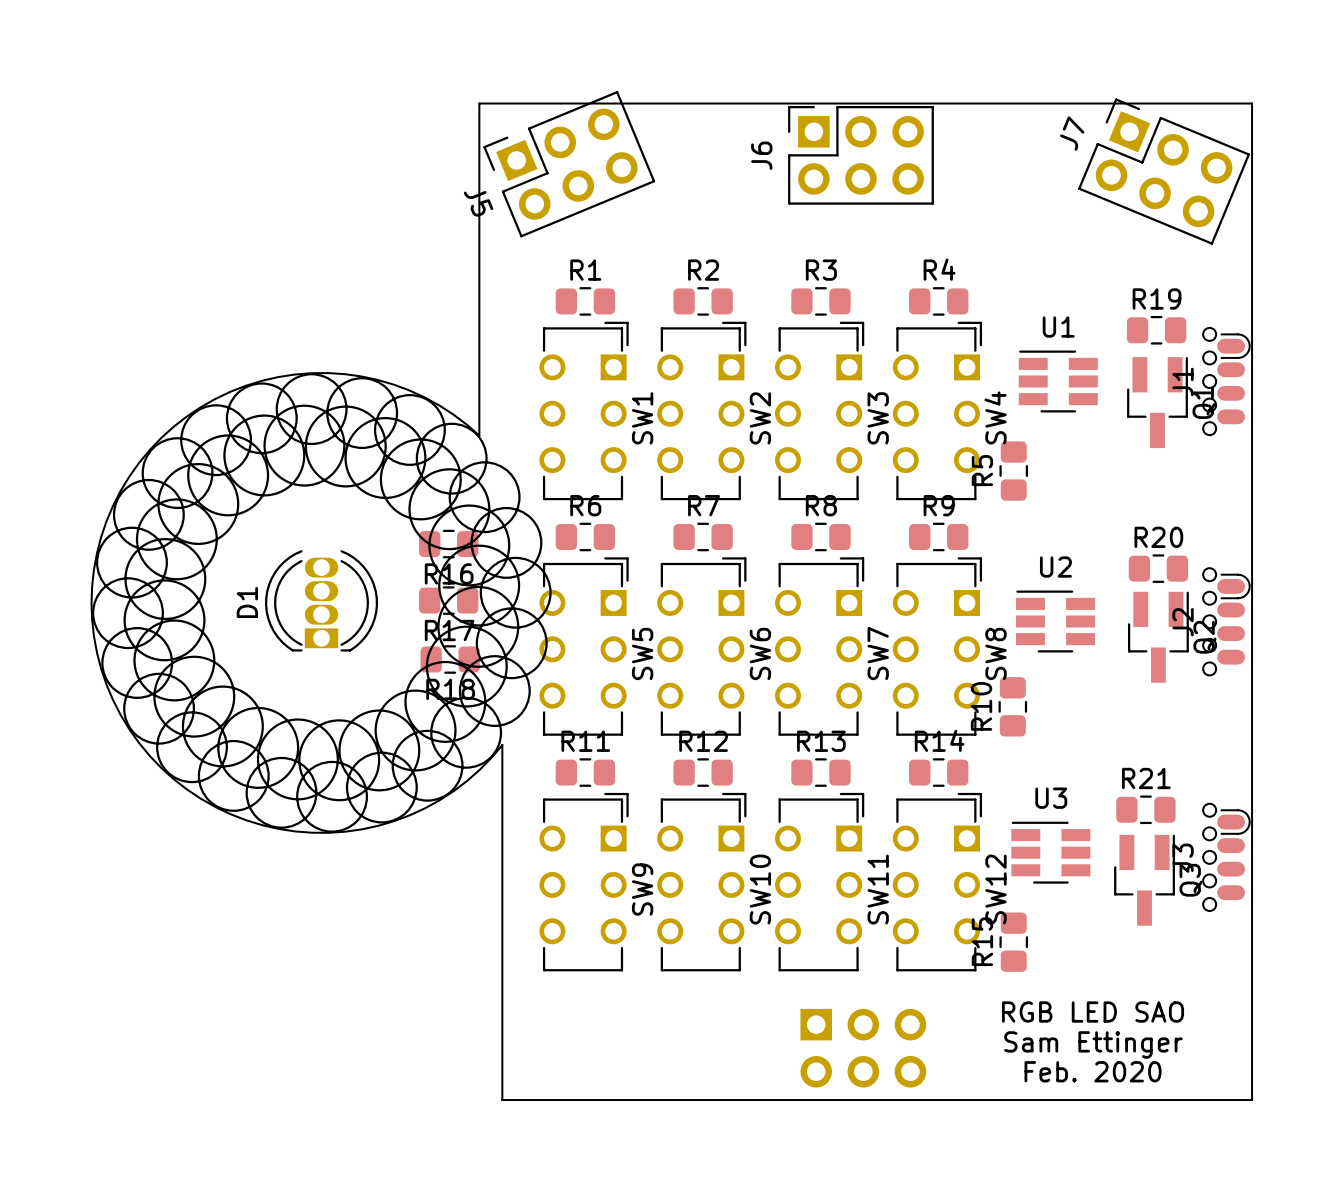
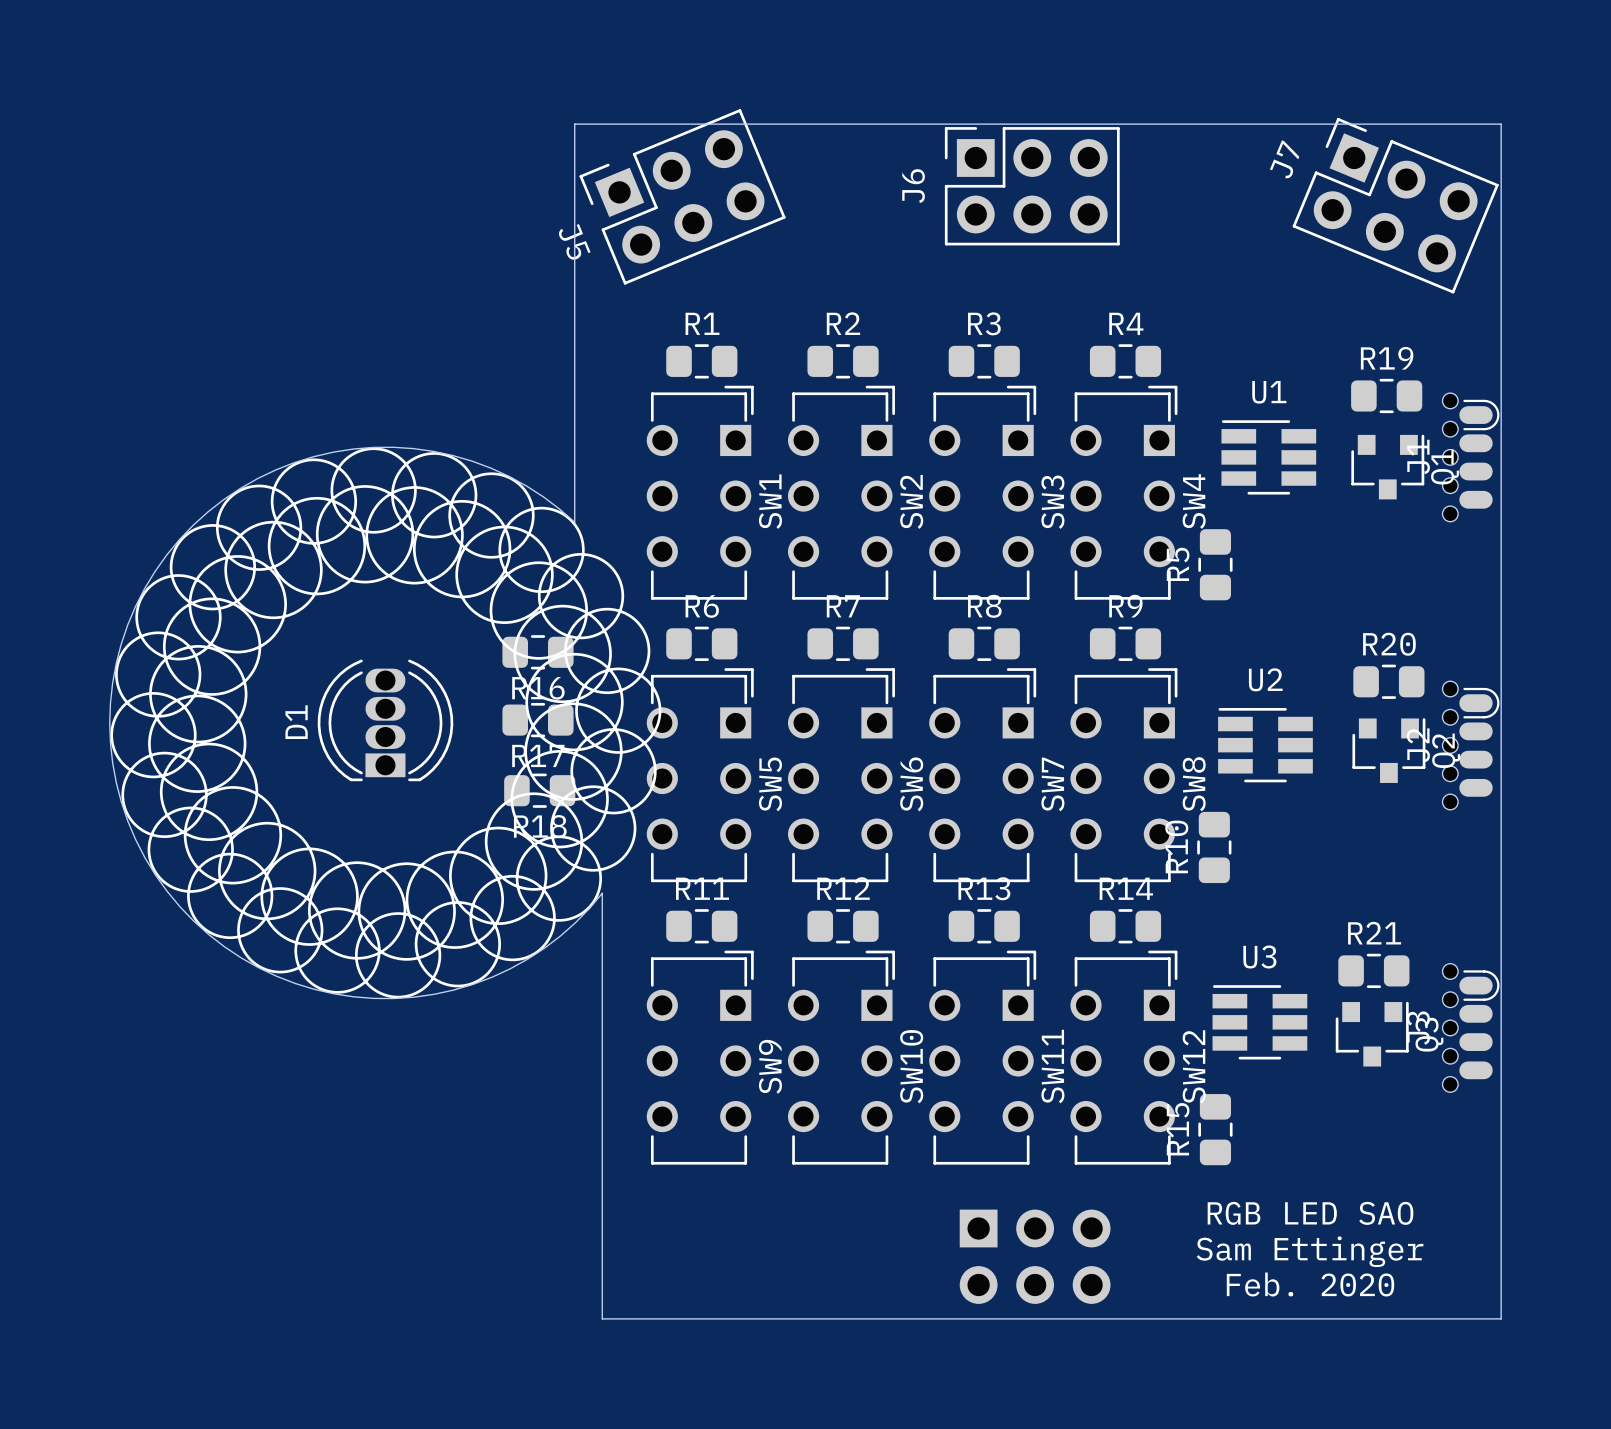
Q1 footprint: [1127, 356, 1188, 449] -> [1351, 434, 1425, 500]
Q2 footprint: [1128, 591, 1189, 683] -> [1352, 718, 1426, 783]
Q3 footprint: [1114, 834, 1175, 926] -> [1335, 1001, 1409, 1067]

